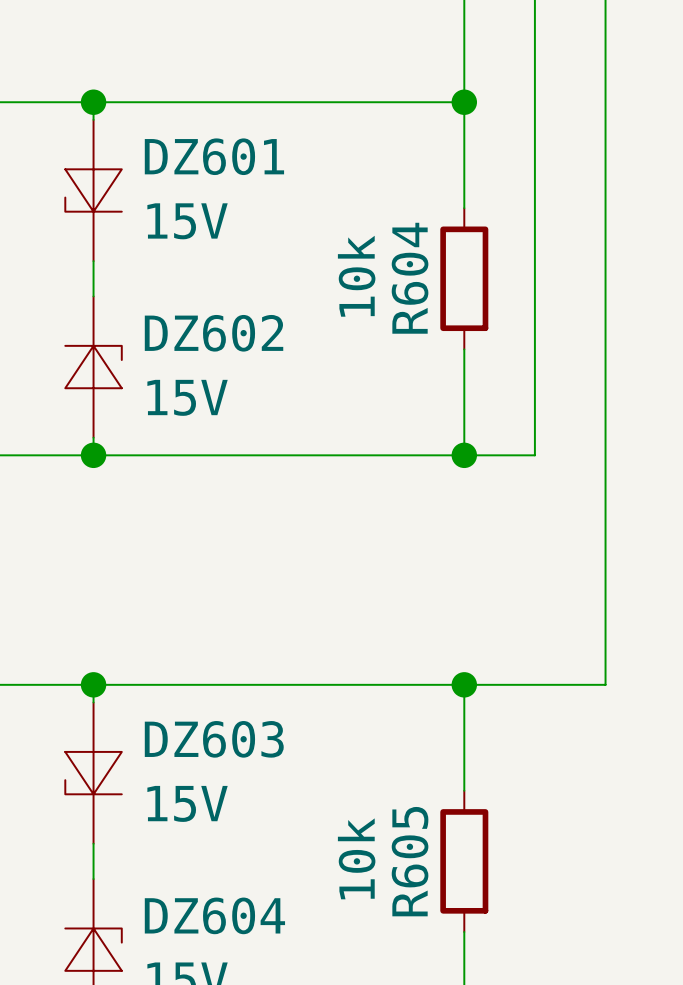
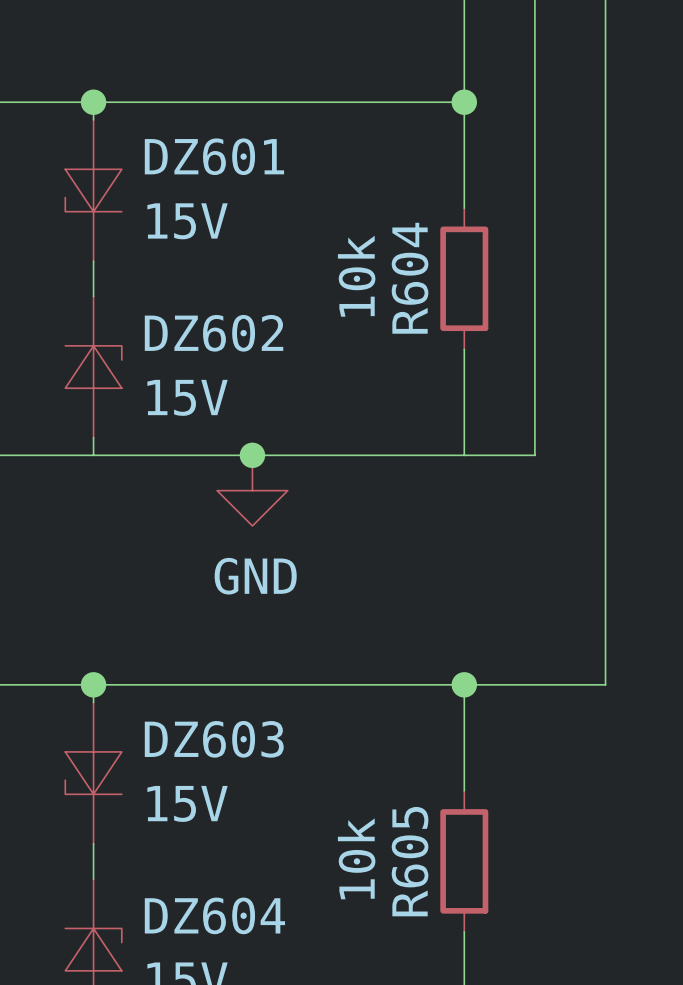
junction: (93, 455) -> none
junction: none -> (252, 455)
junction: (464, 455) -> none
power symbol: none -> GND (252, 490)

